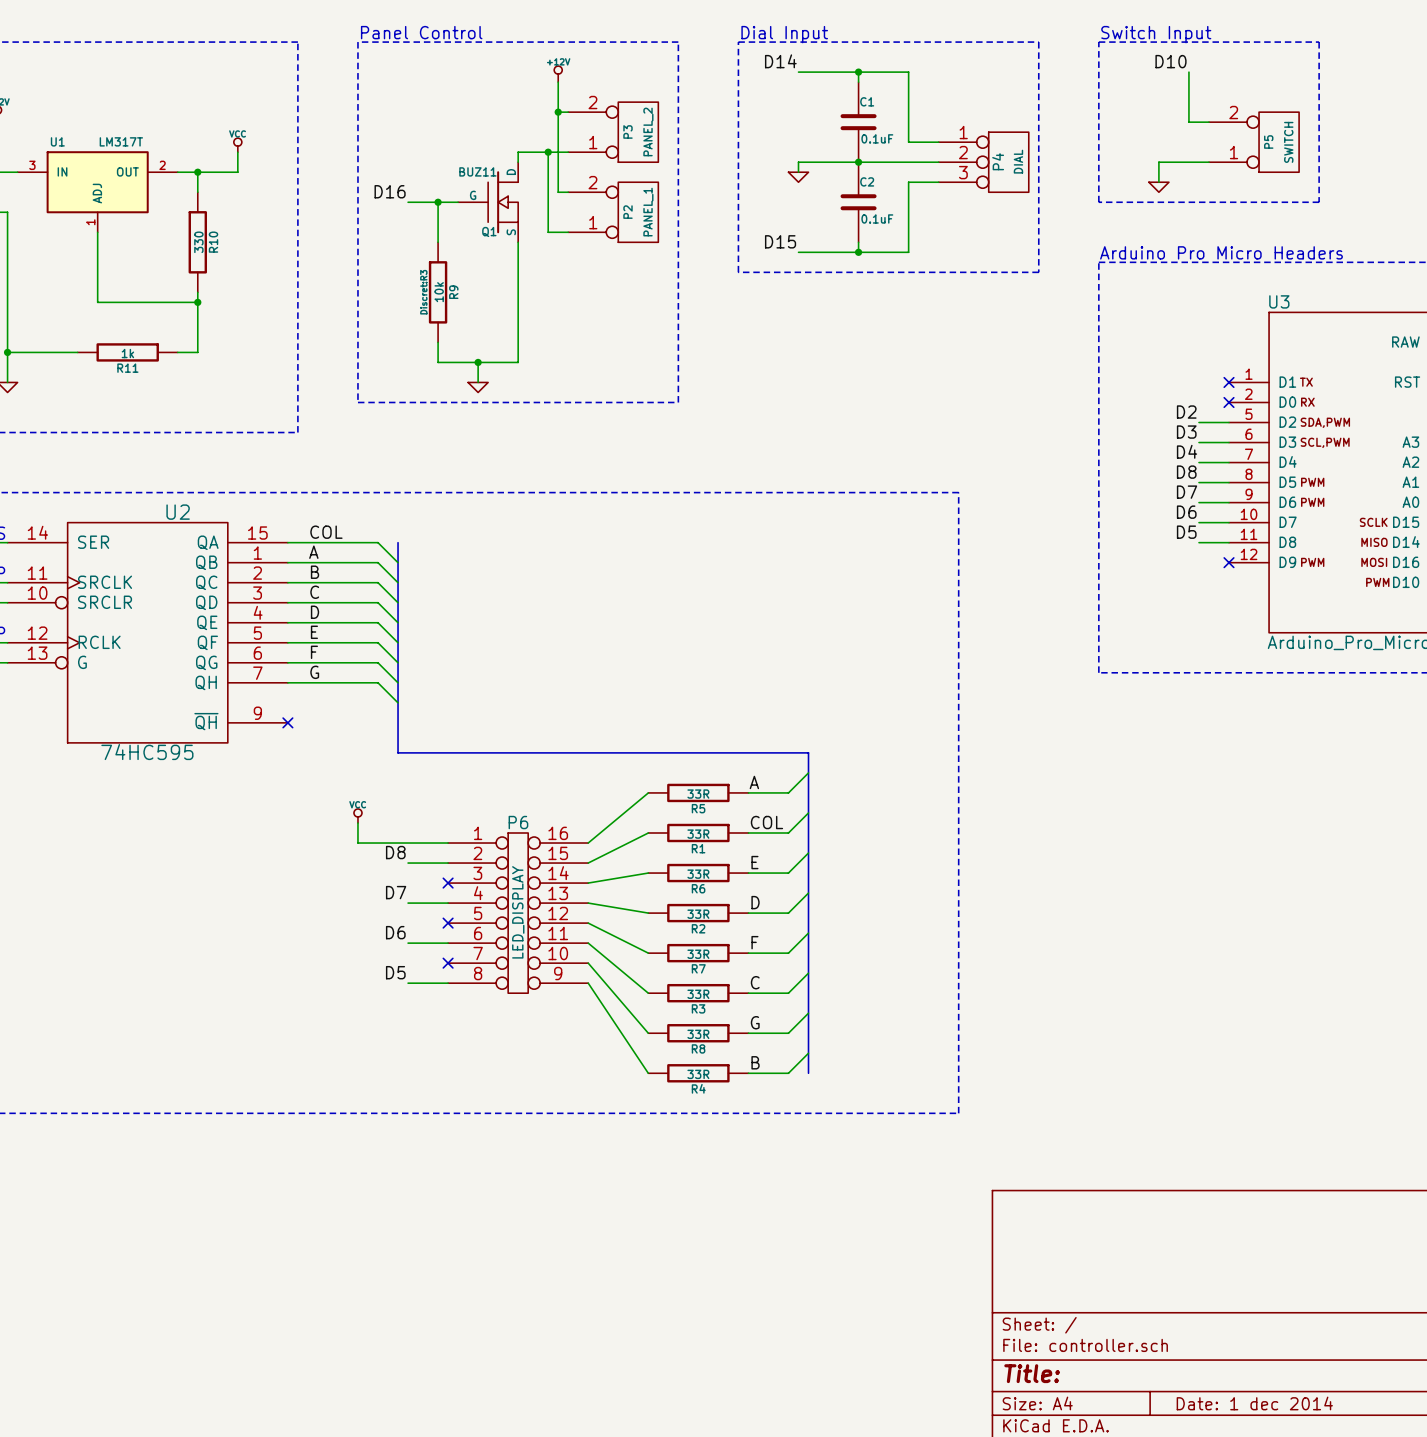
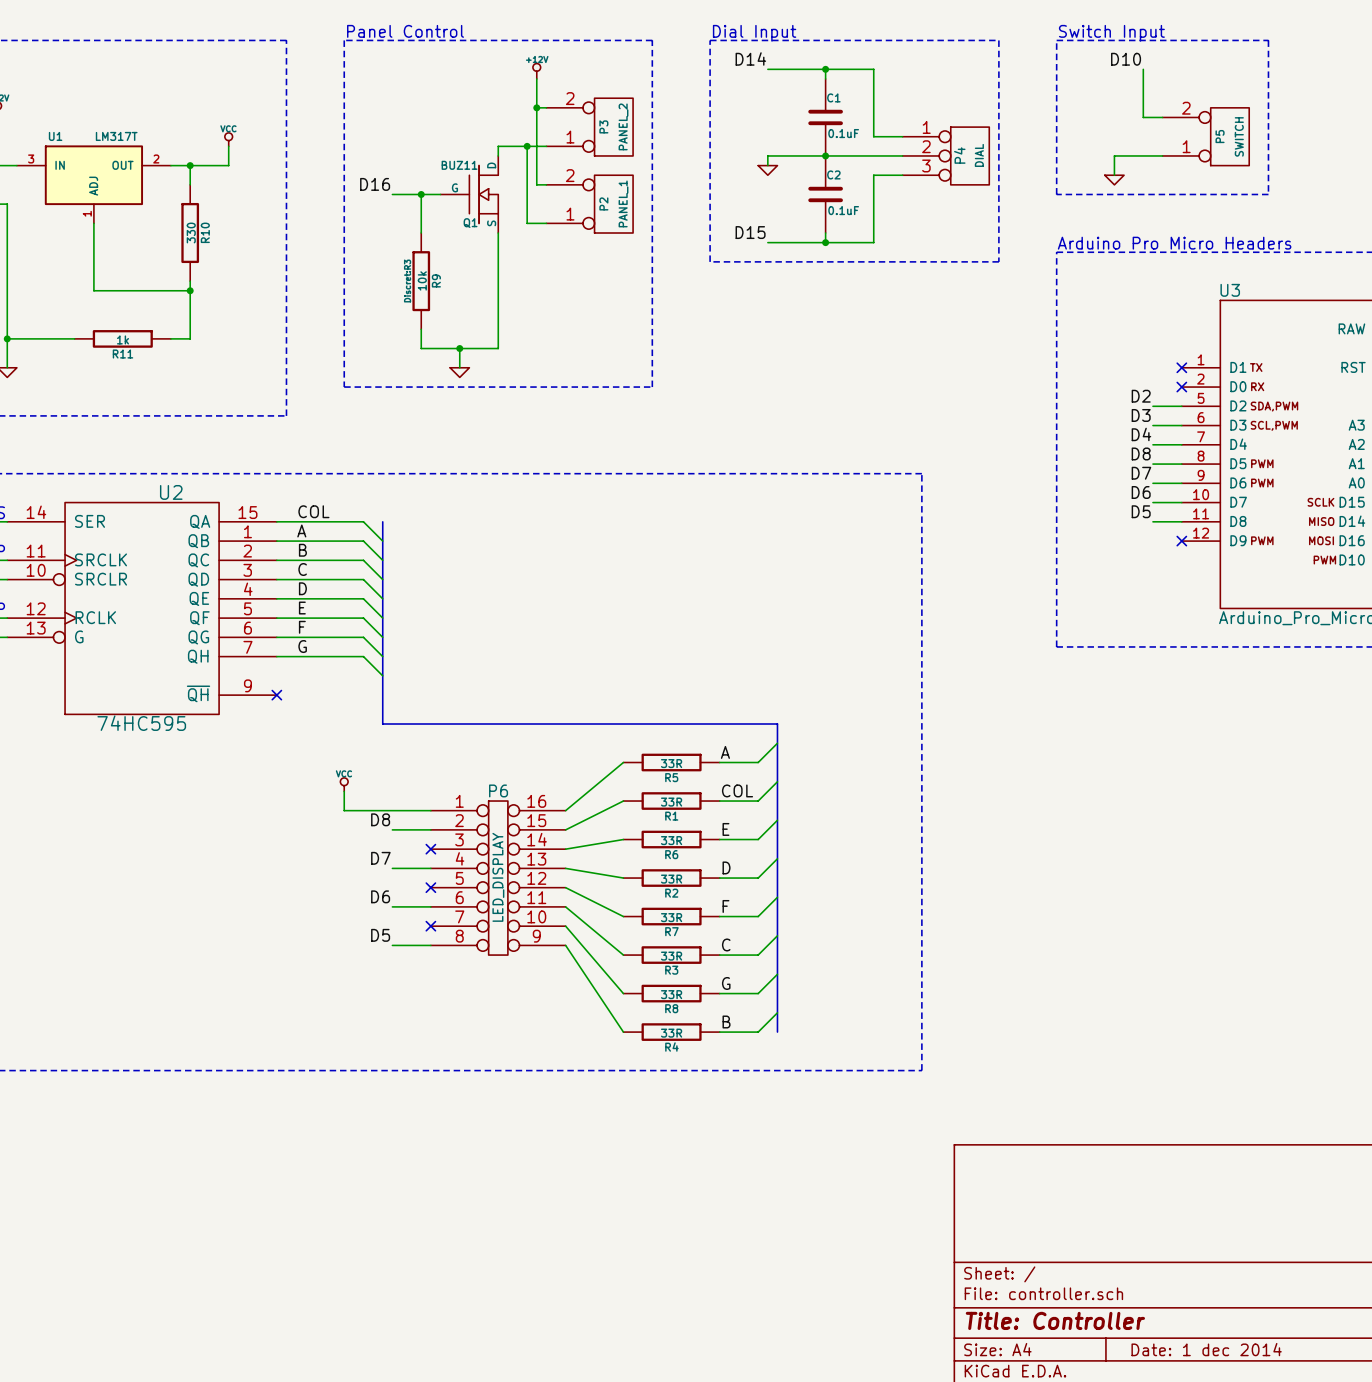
title block: Title: (1032, 1373) -> Title: Controller (1055, 1320)

